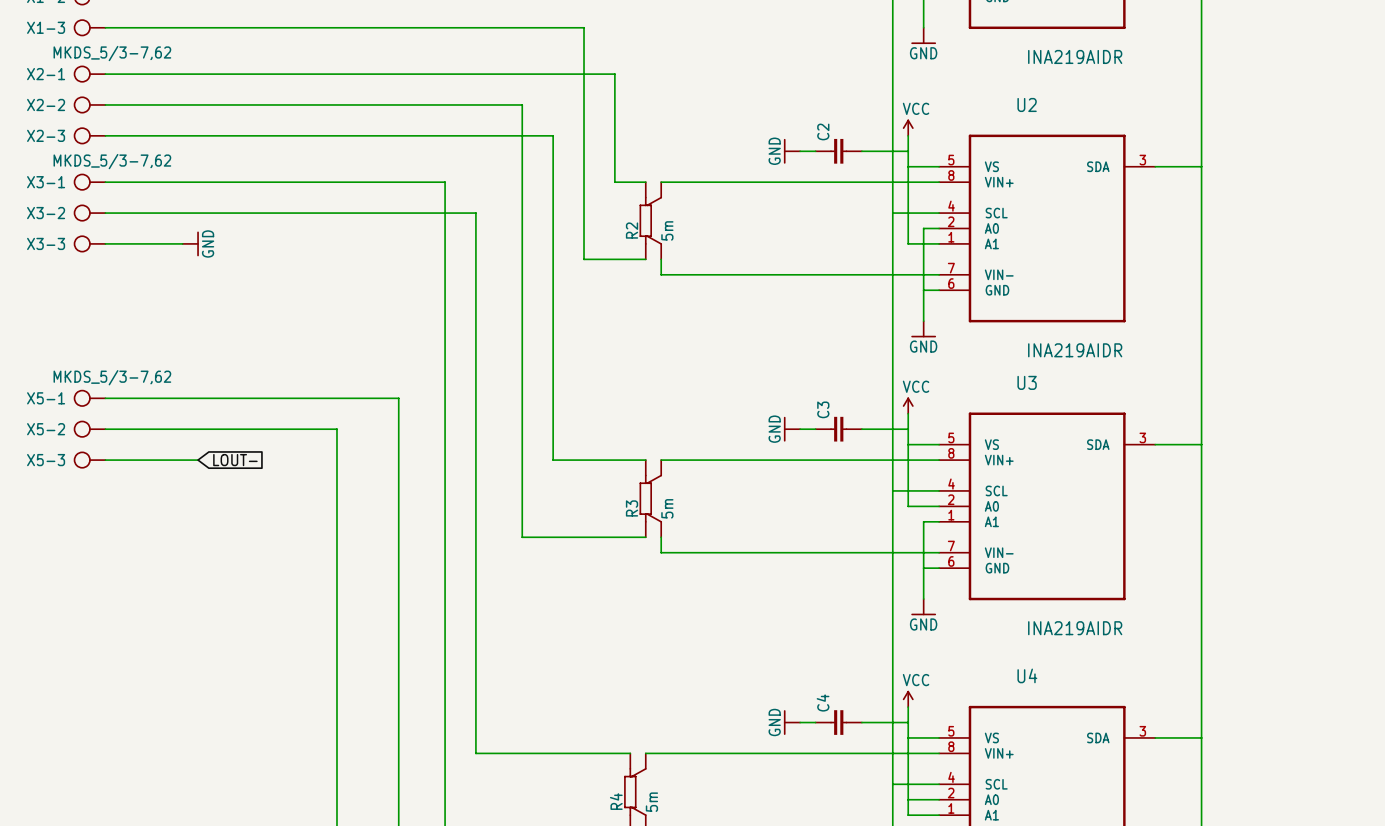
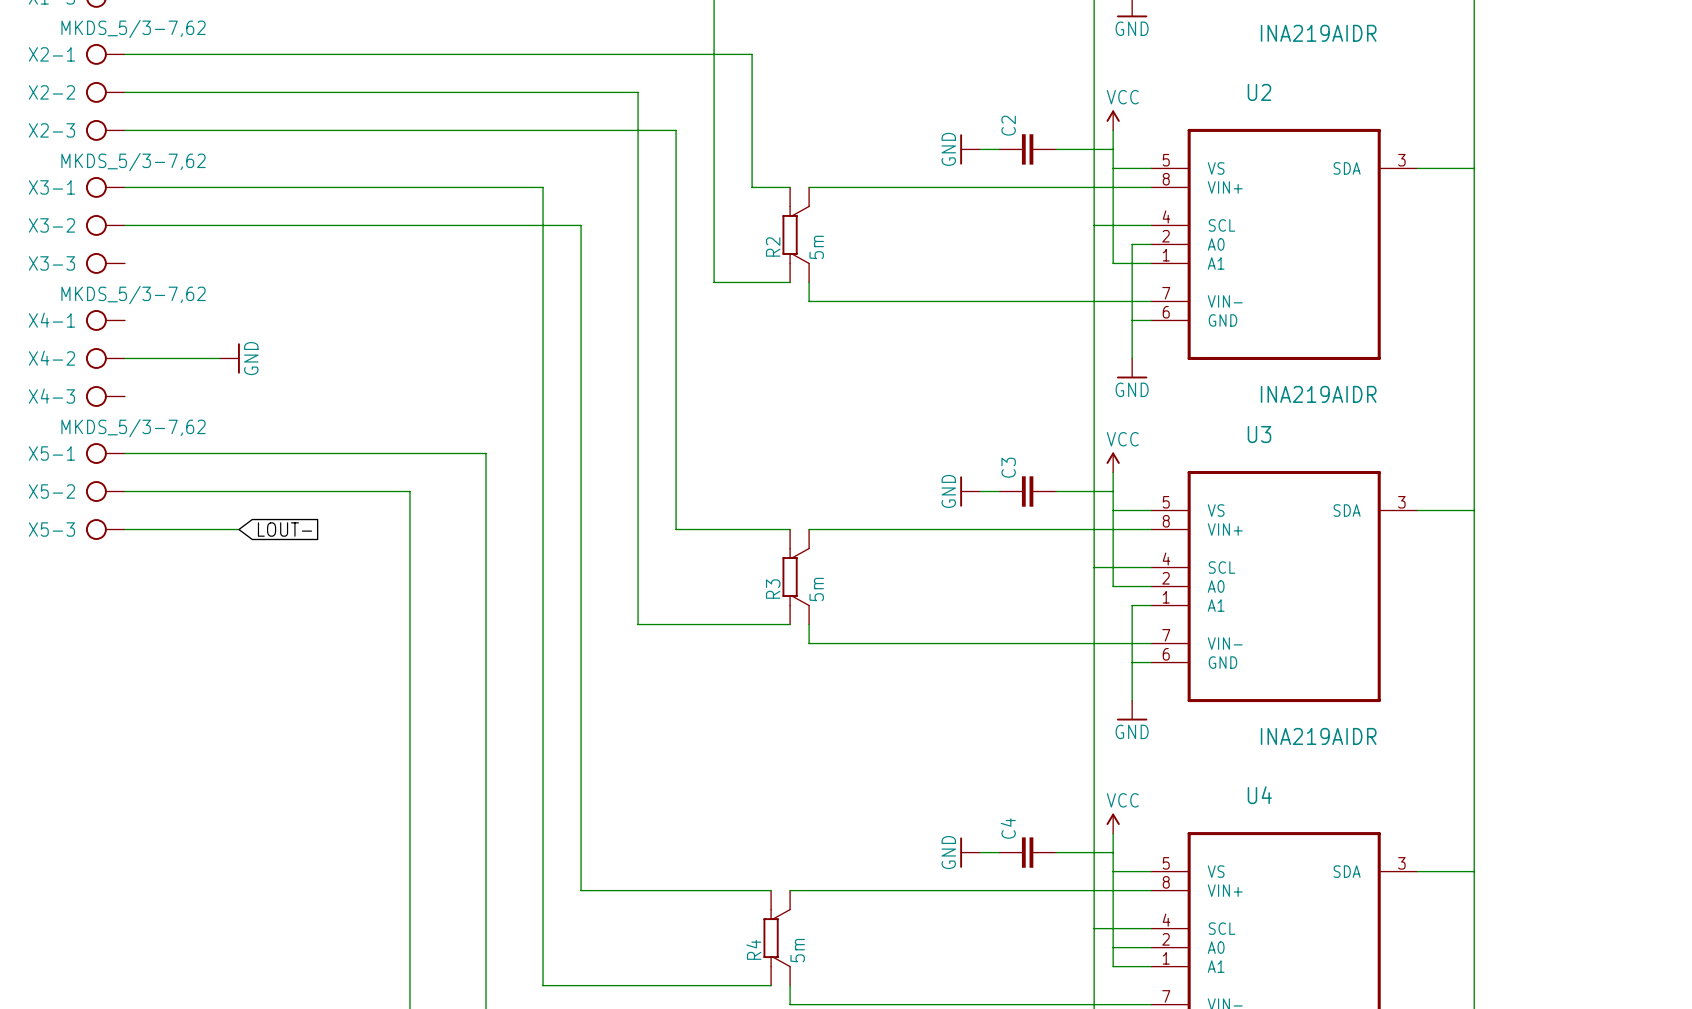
wire: (105, 243) (182, 243) -> (124, 358) (219, 358)
power symbol position: GND (190, 243) -> GND (229, 358)
X4-1: none -> MKDS_5/3-7,62 (105, 320)
X4-2: none -> (105, 358)
X4-3: none -> (105, 396)

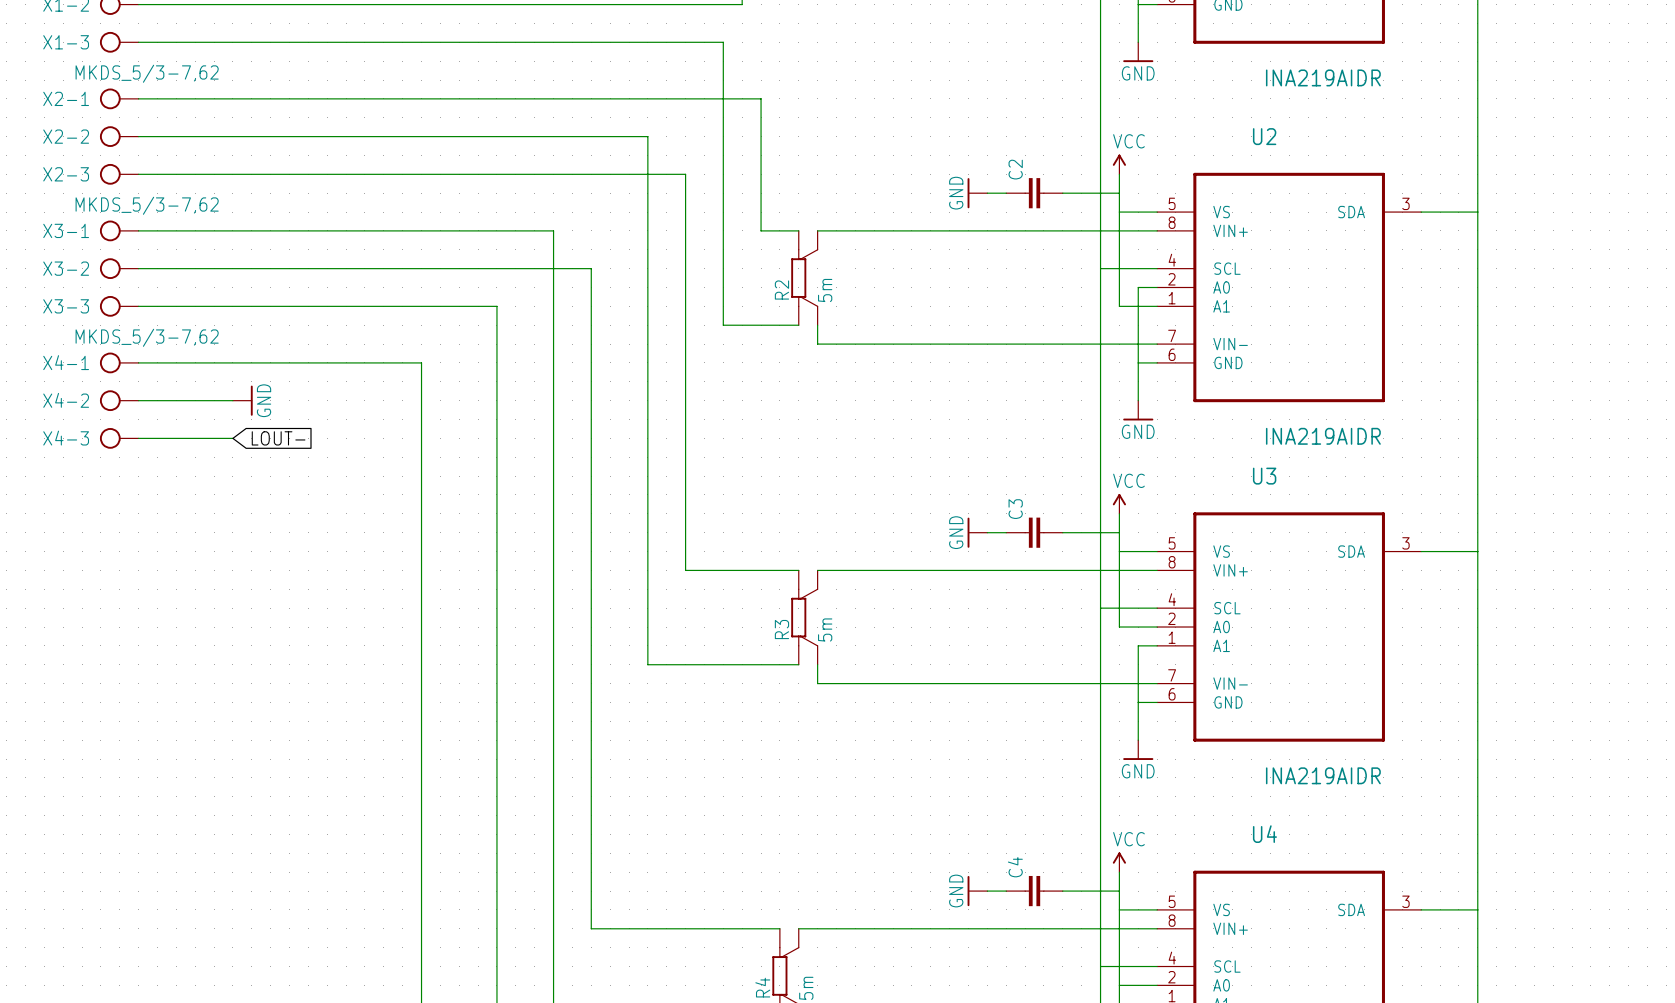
wire: none -> (138, 438) (232, 438)
X5-1: MKDS_5/3-7,62 (105, 453) -> none
wire: (124, 453) (486, 453) -> (138, 306) (496, 306) (496, 494)
X5-2: (105, 491) -> none
wire: (124, 491) (409, 491) -> (138, 362) (421, 362) (421, 532)
X5-3: (105, 529) -> none
wire: (124, 529) (238, 529) -> none
global label position: LOUT- (284, 529) -> LOUT- (278, 438)

